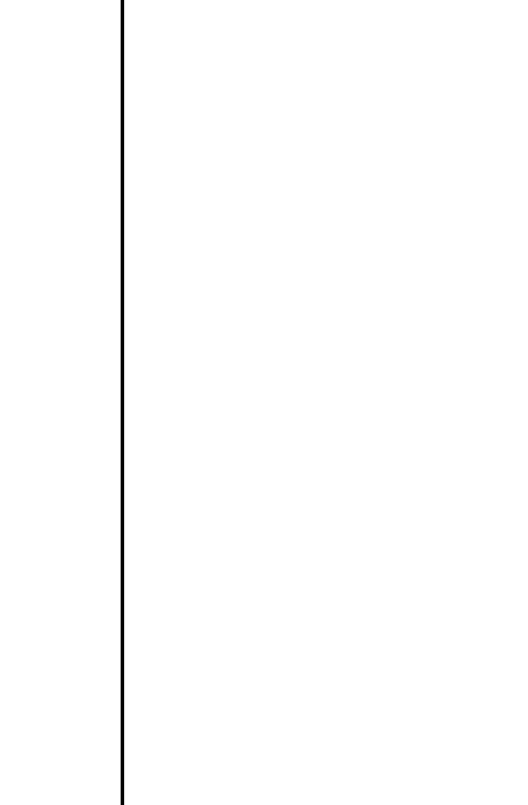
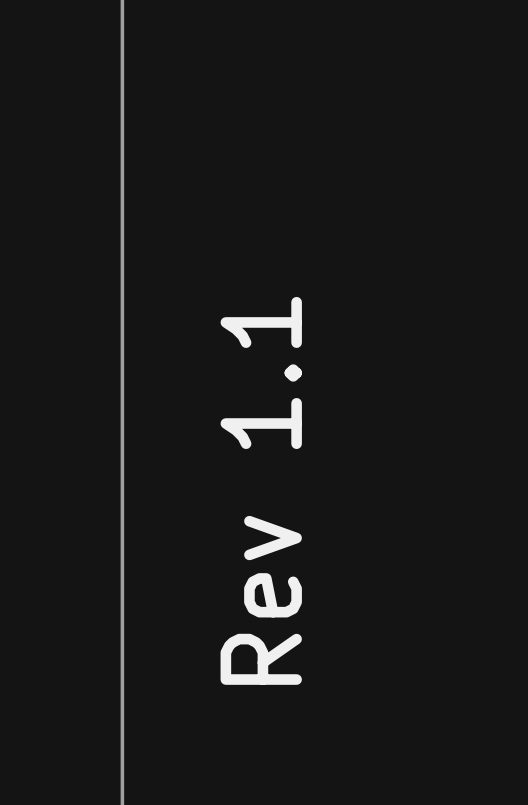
text: none -> Rev 1.1 (261, 490)

